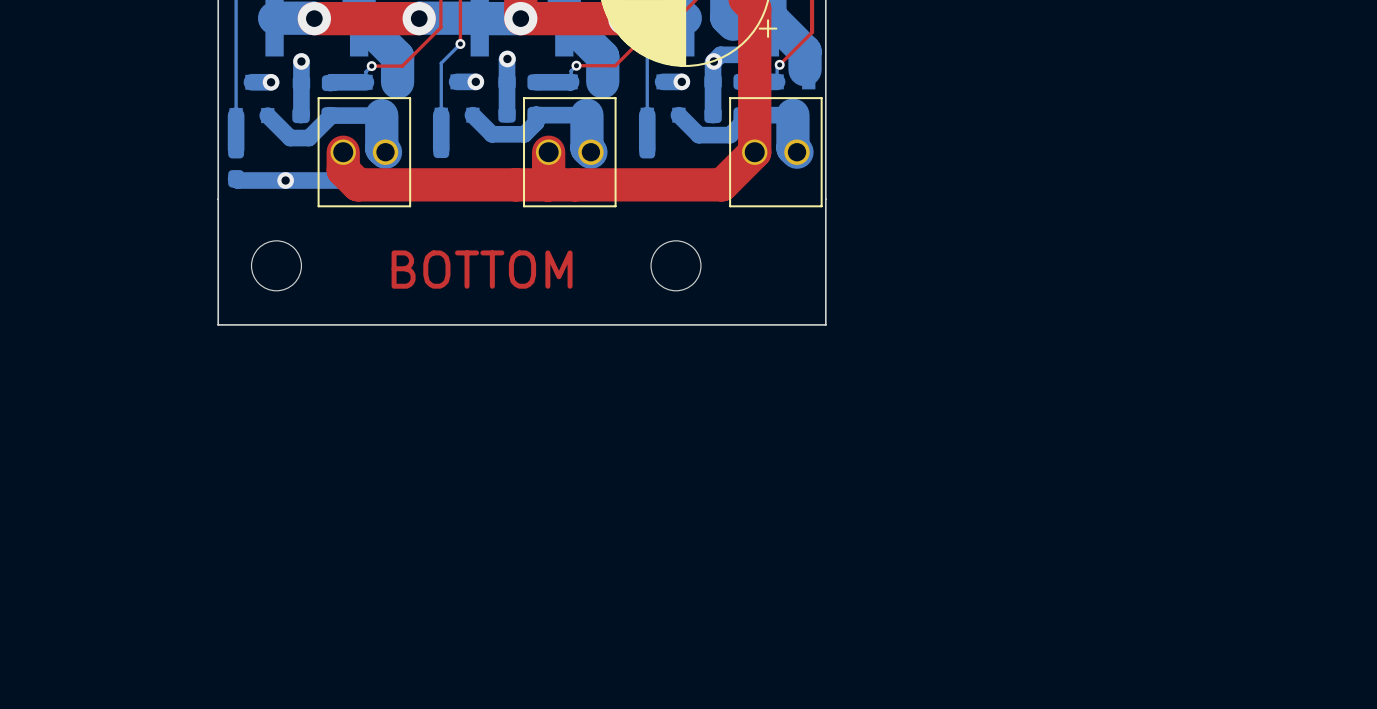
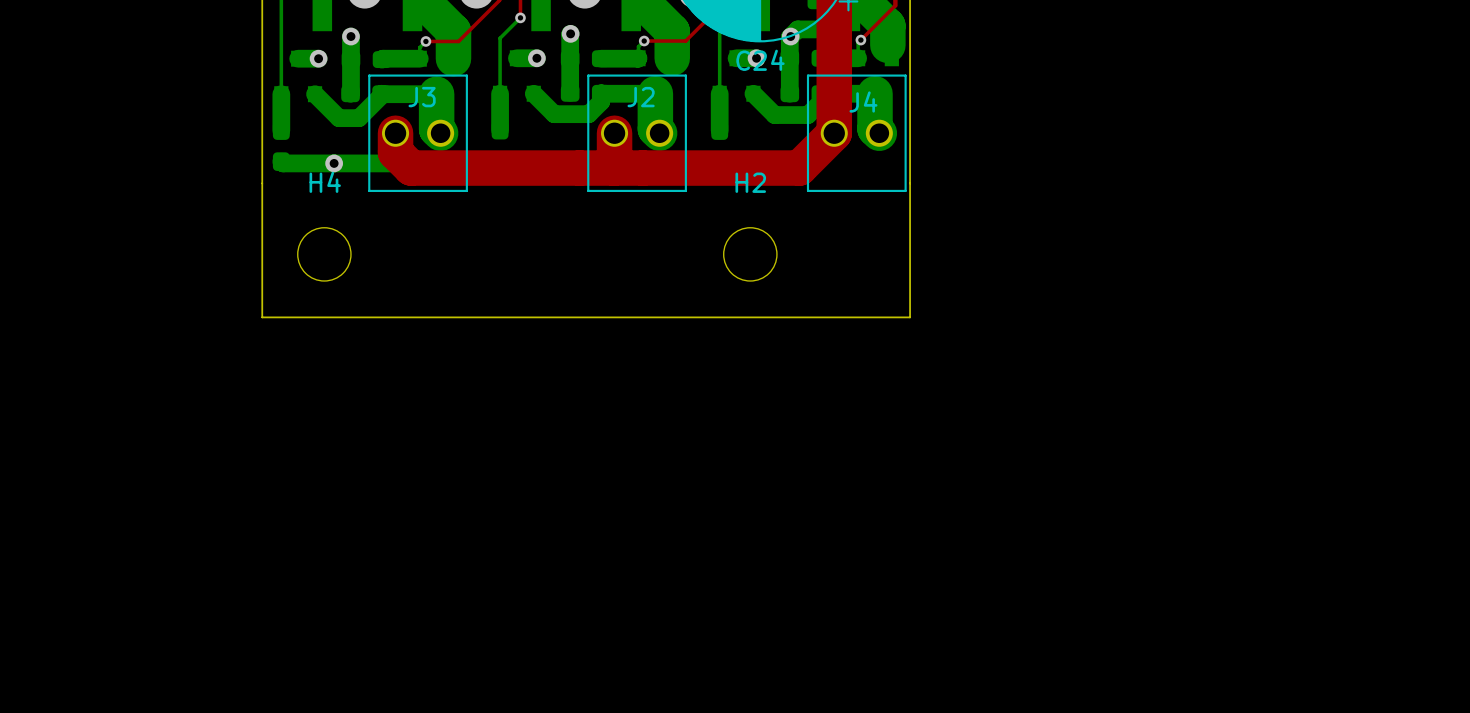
C24 name: none -> C24 (760, 60)
J3 name: none -> J3 (422, 97)
J2 name: none -> J2 (641, 97)
J4 name: none -> J4 (863, 102)
H4 name: none -> H4 (325, 182)
H2 name: none -> H2 (750, 182)
text: BOTTOM (482, 269) -> none

